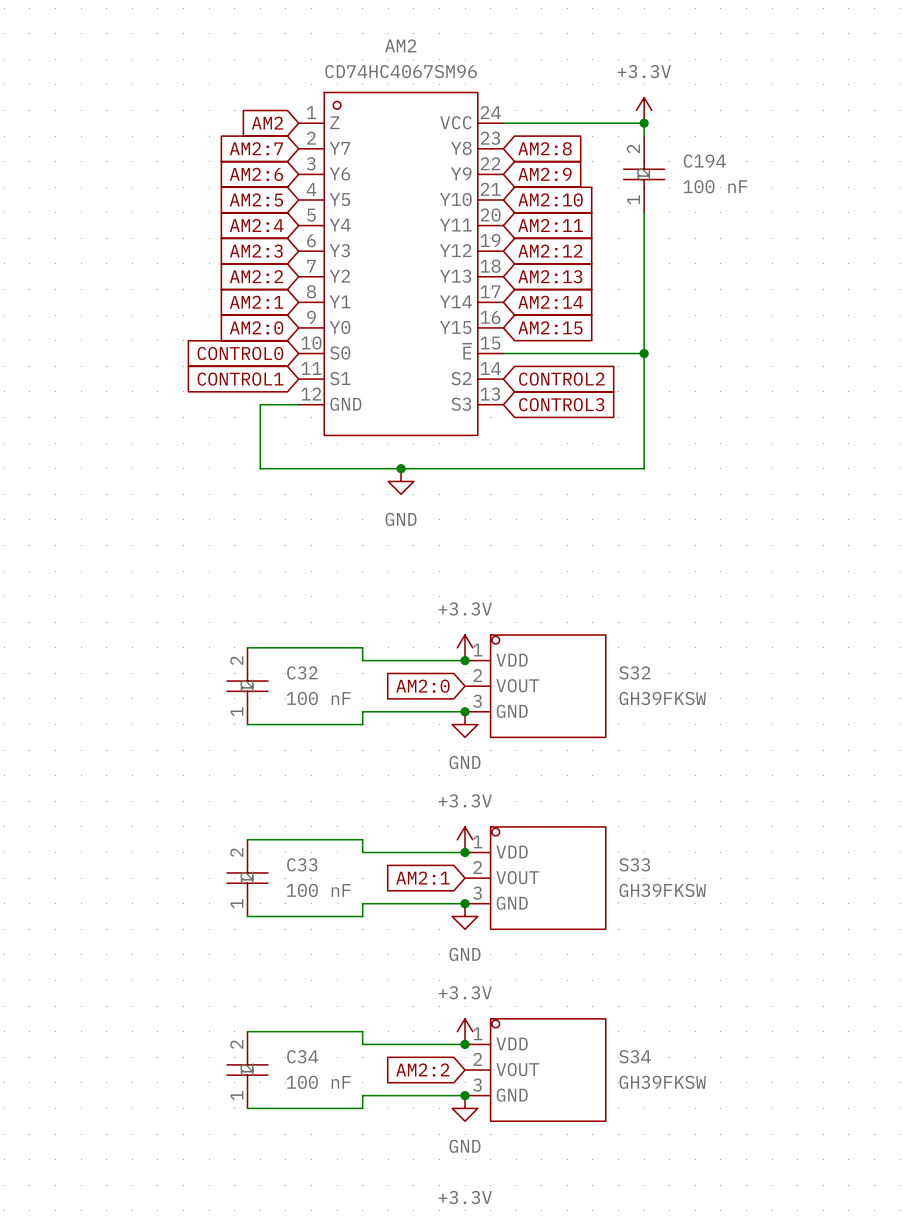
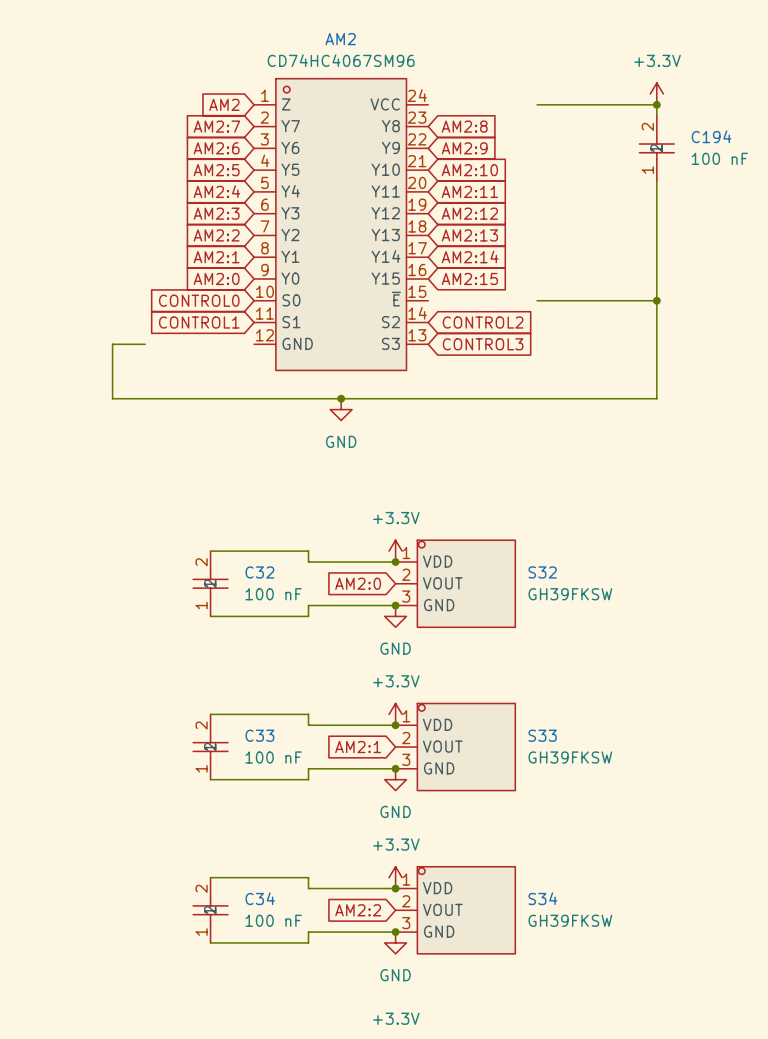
power symbol position: +3.3V (644, 110) -> +3.3V (656, 93)
wire: (503, 123) (631, 123) -> none
wire: (644, 123) (644, 136) -> (547, 104) (656, 104) (656, 115)
junction: (644, 123) -> none
junction: none -> (656, 104)
C194 position: (644, 174) -> (656, 148)
wire: (644, 212) (644, 468) -> (656, 181) (656, 398) (547, 398)
wire: (503, 353) (631, 353) -> (547, 300) (656, 300)
junction: (644, 353) -> none
junction: none -> (656, 300)
wire: (298, 404) (260, 404) (260, 468) -> (145, 344) (112, 344) (112, 398) (221, 398)

